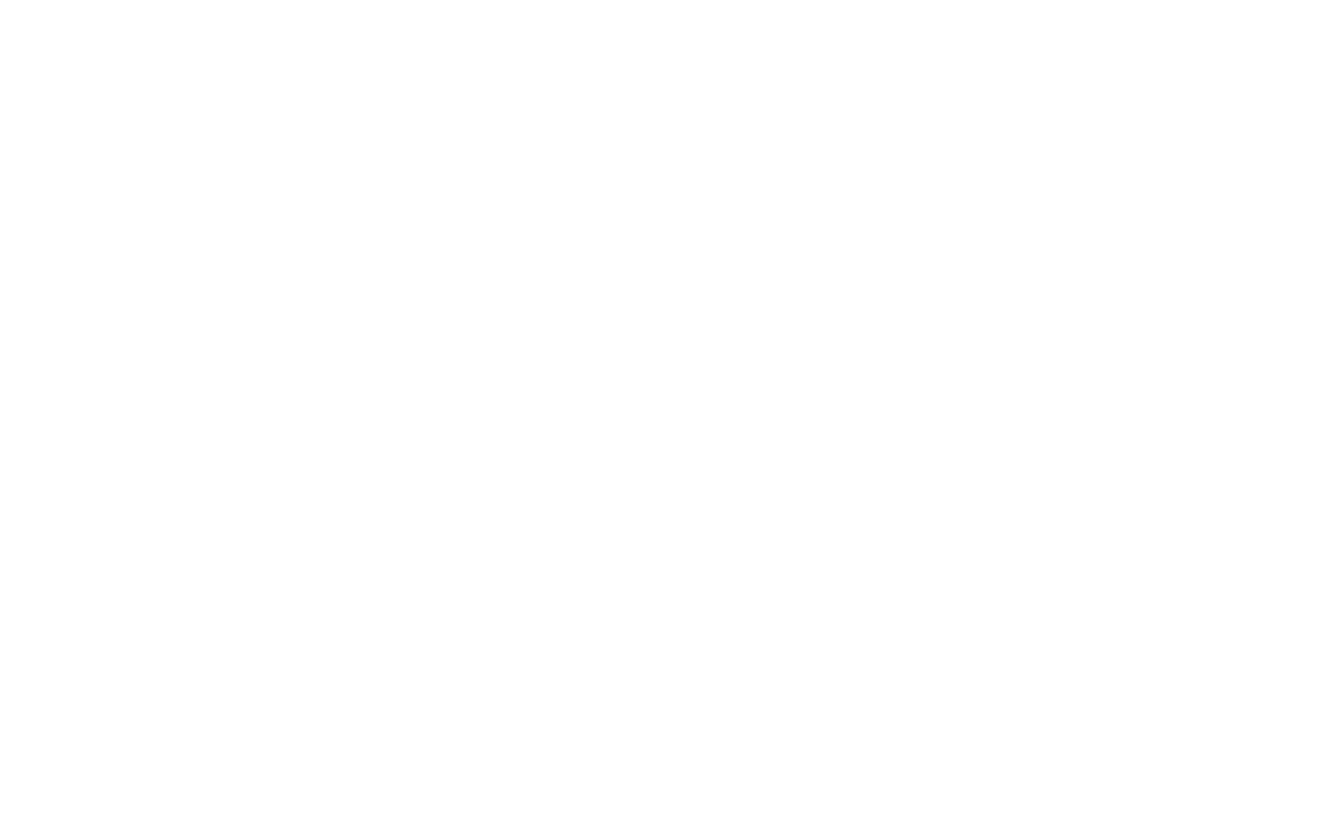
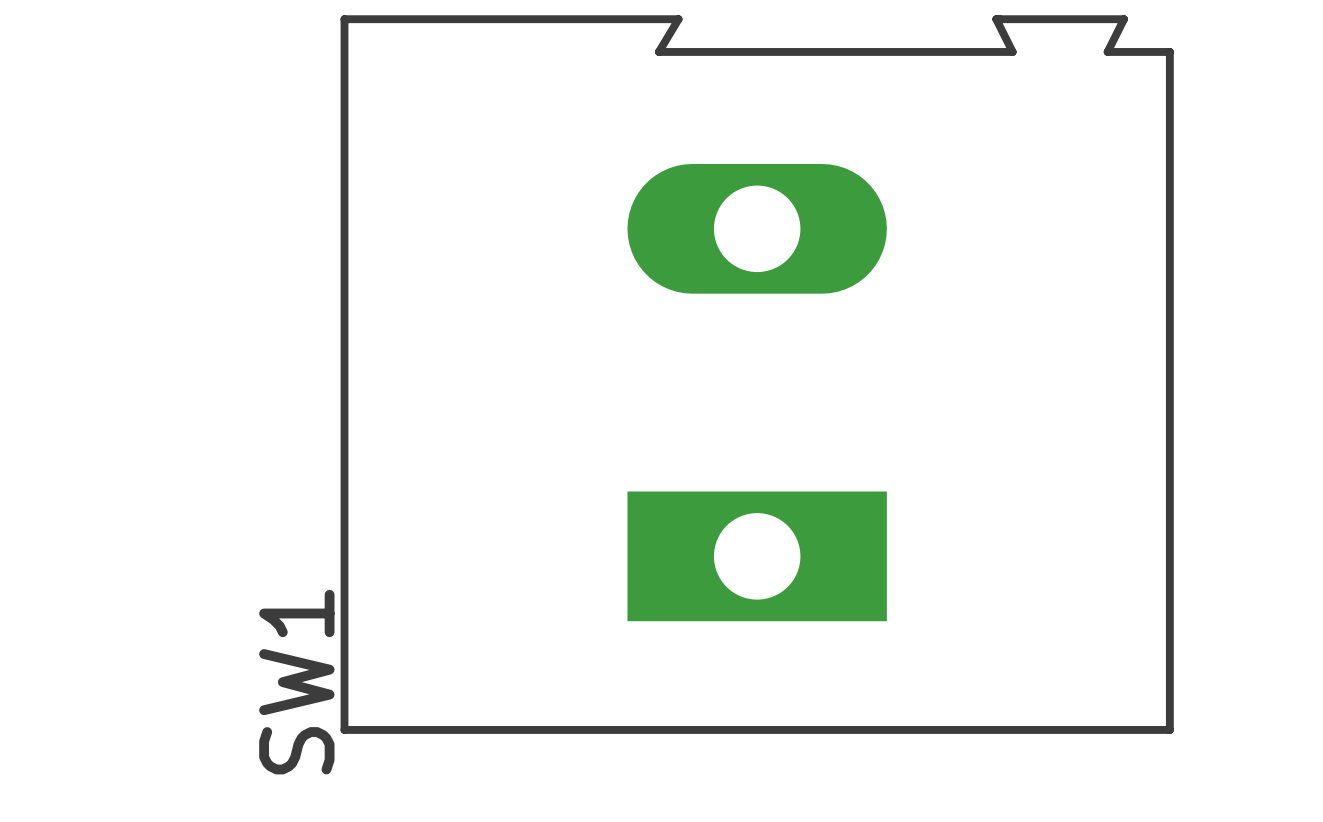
SW1: none -> (757, 374)

